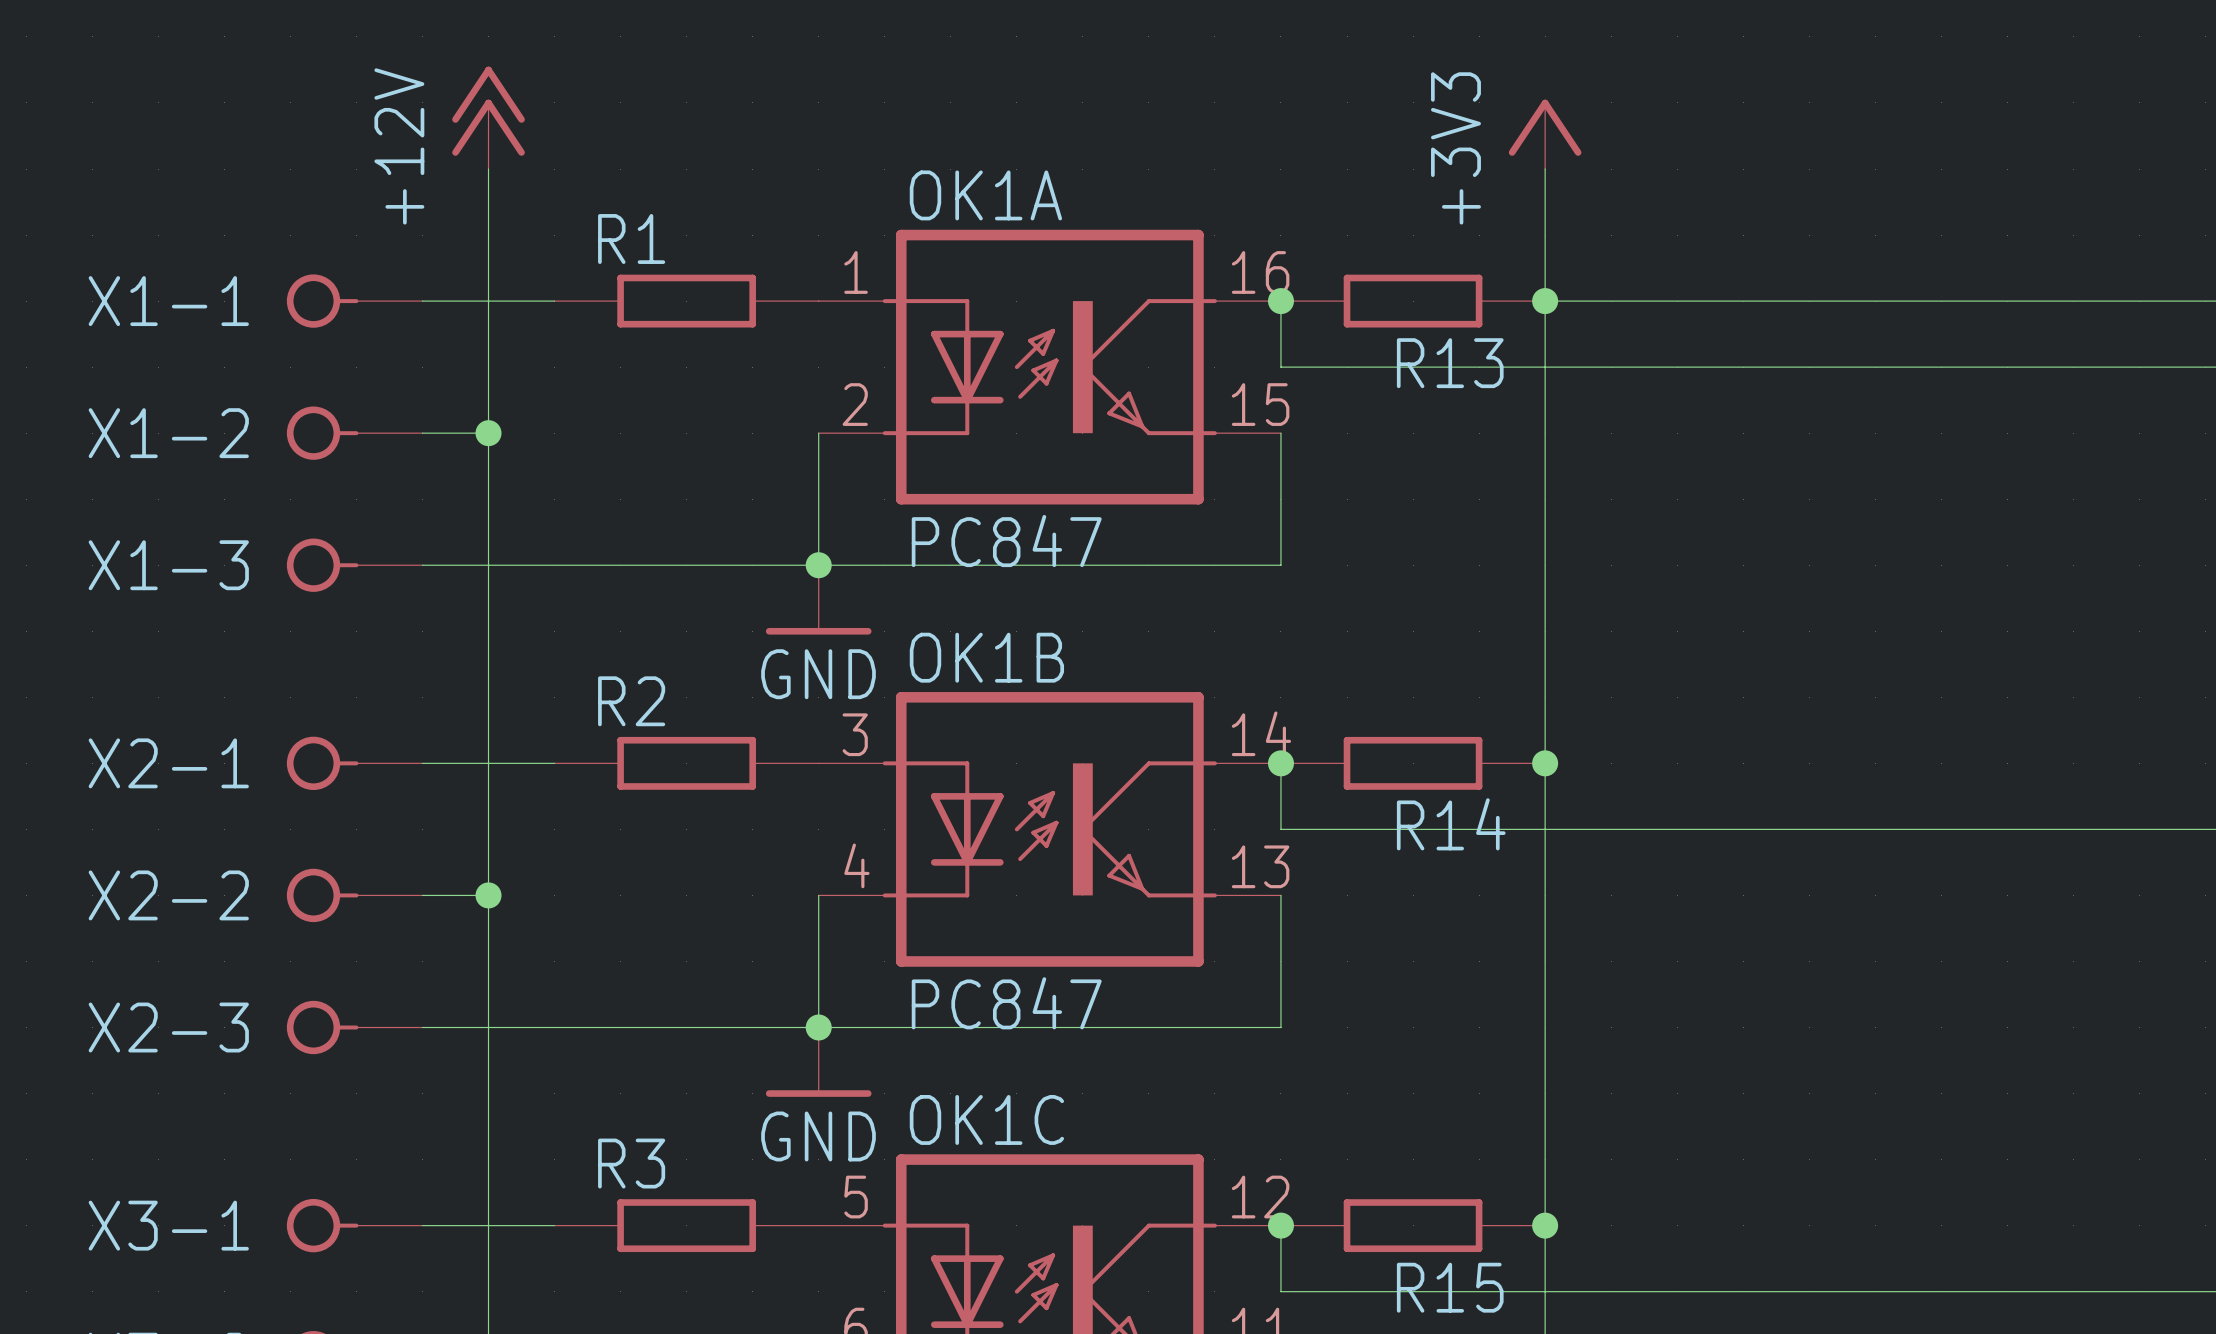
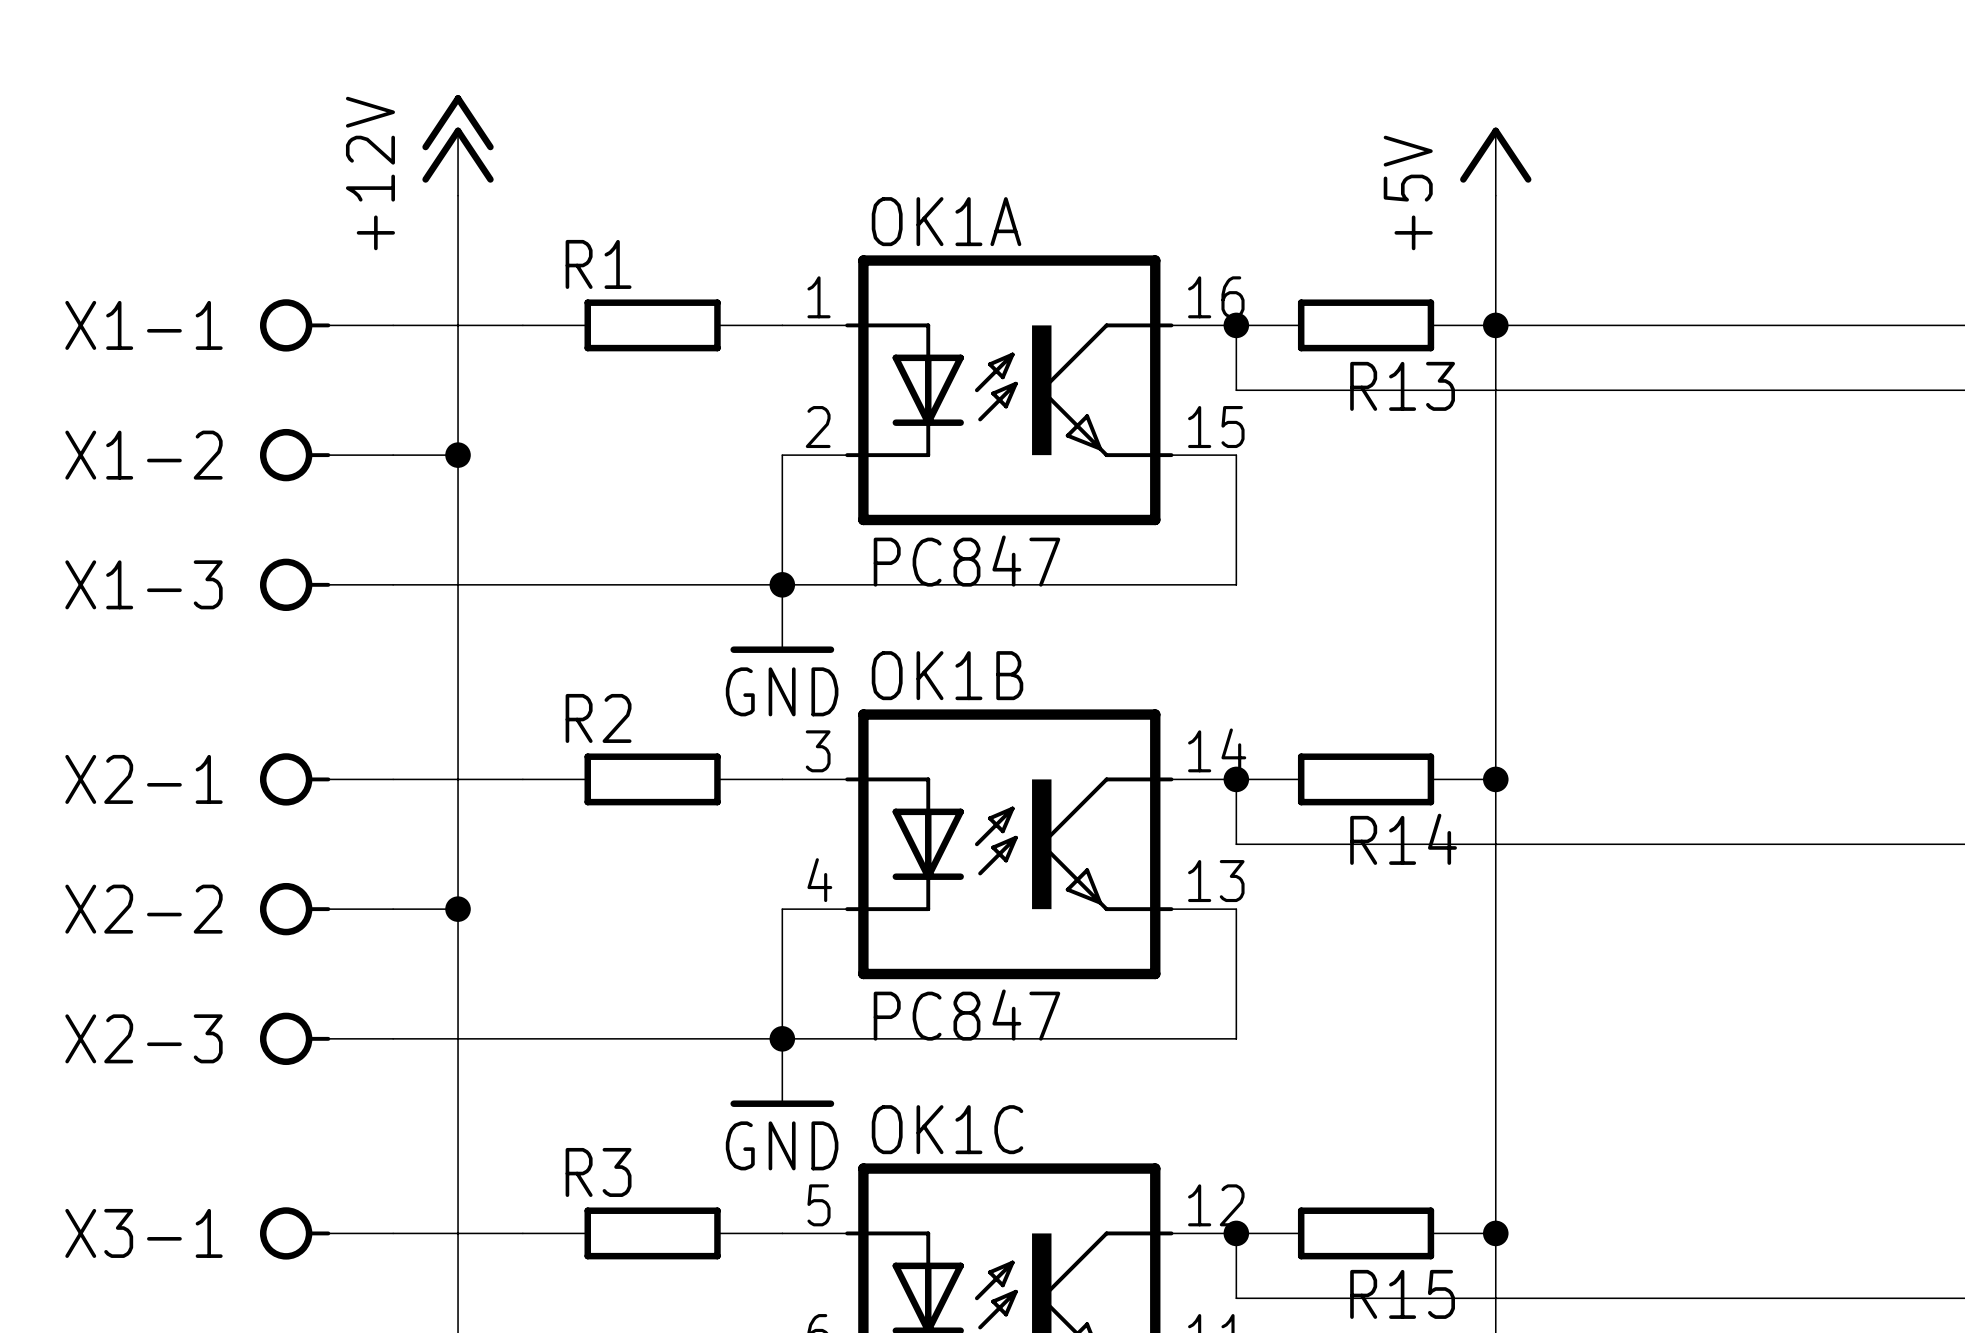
power symbol: +3V3 (1545, 134) -> +5V (1495, 161)

